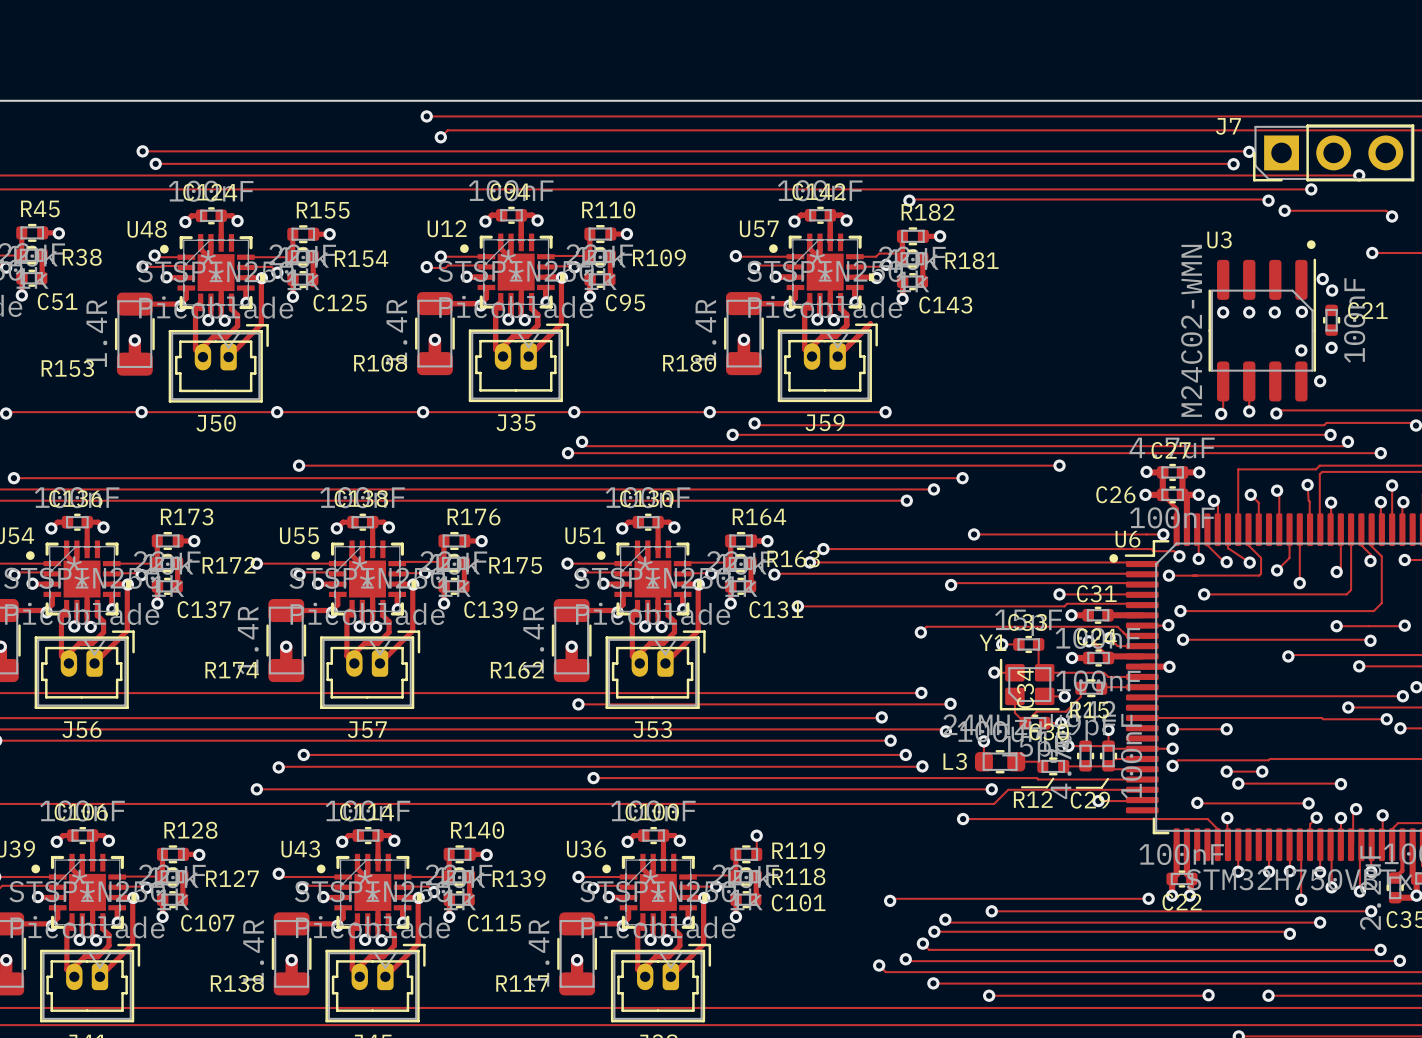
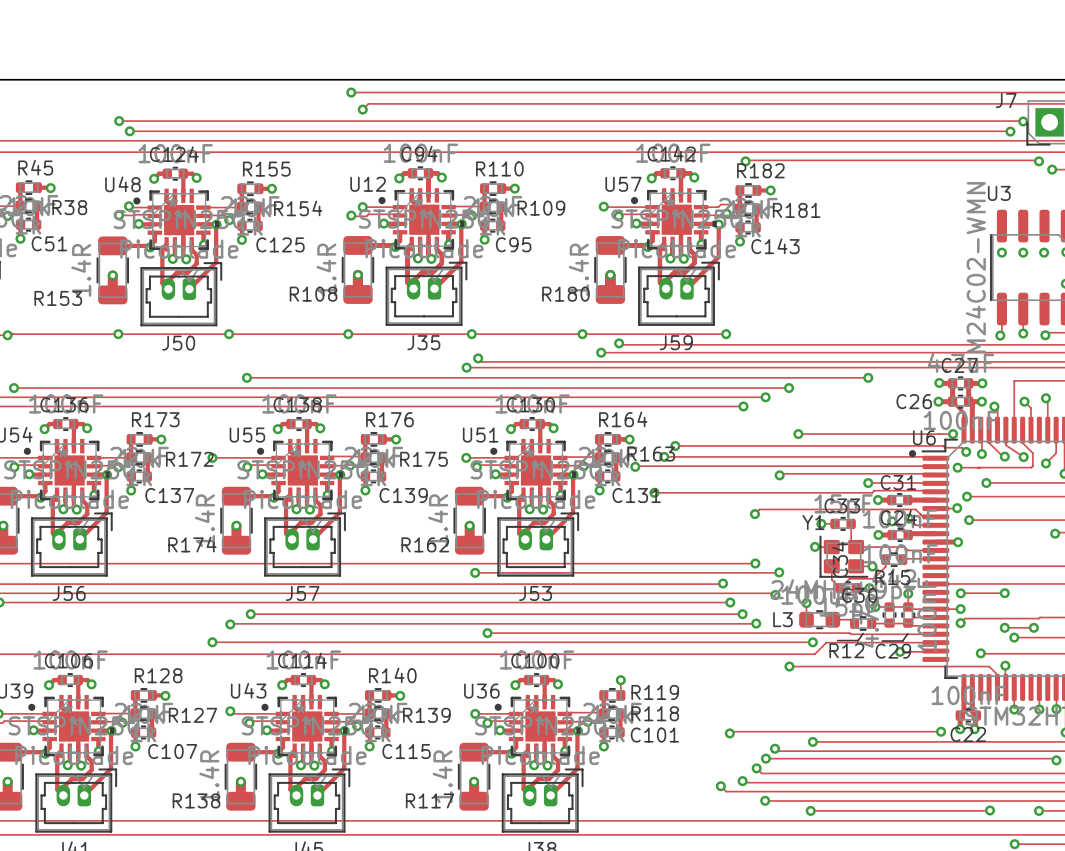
track: none -> (718, 224) (718, 256) (713, 261)

